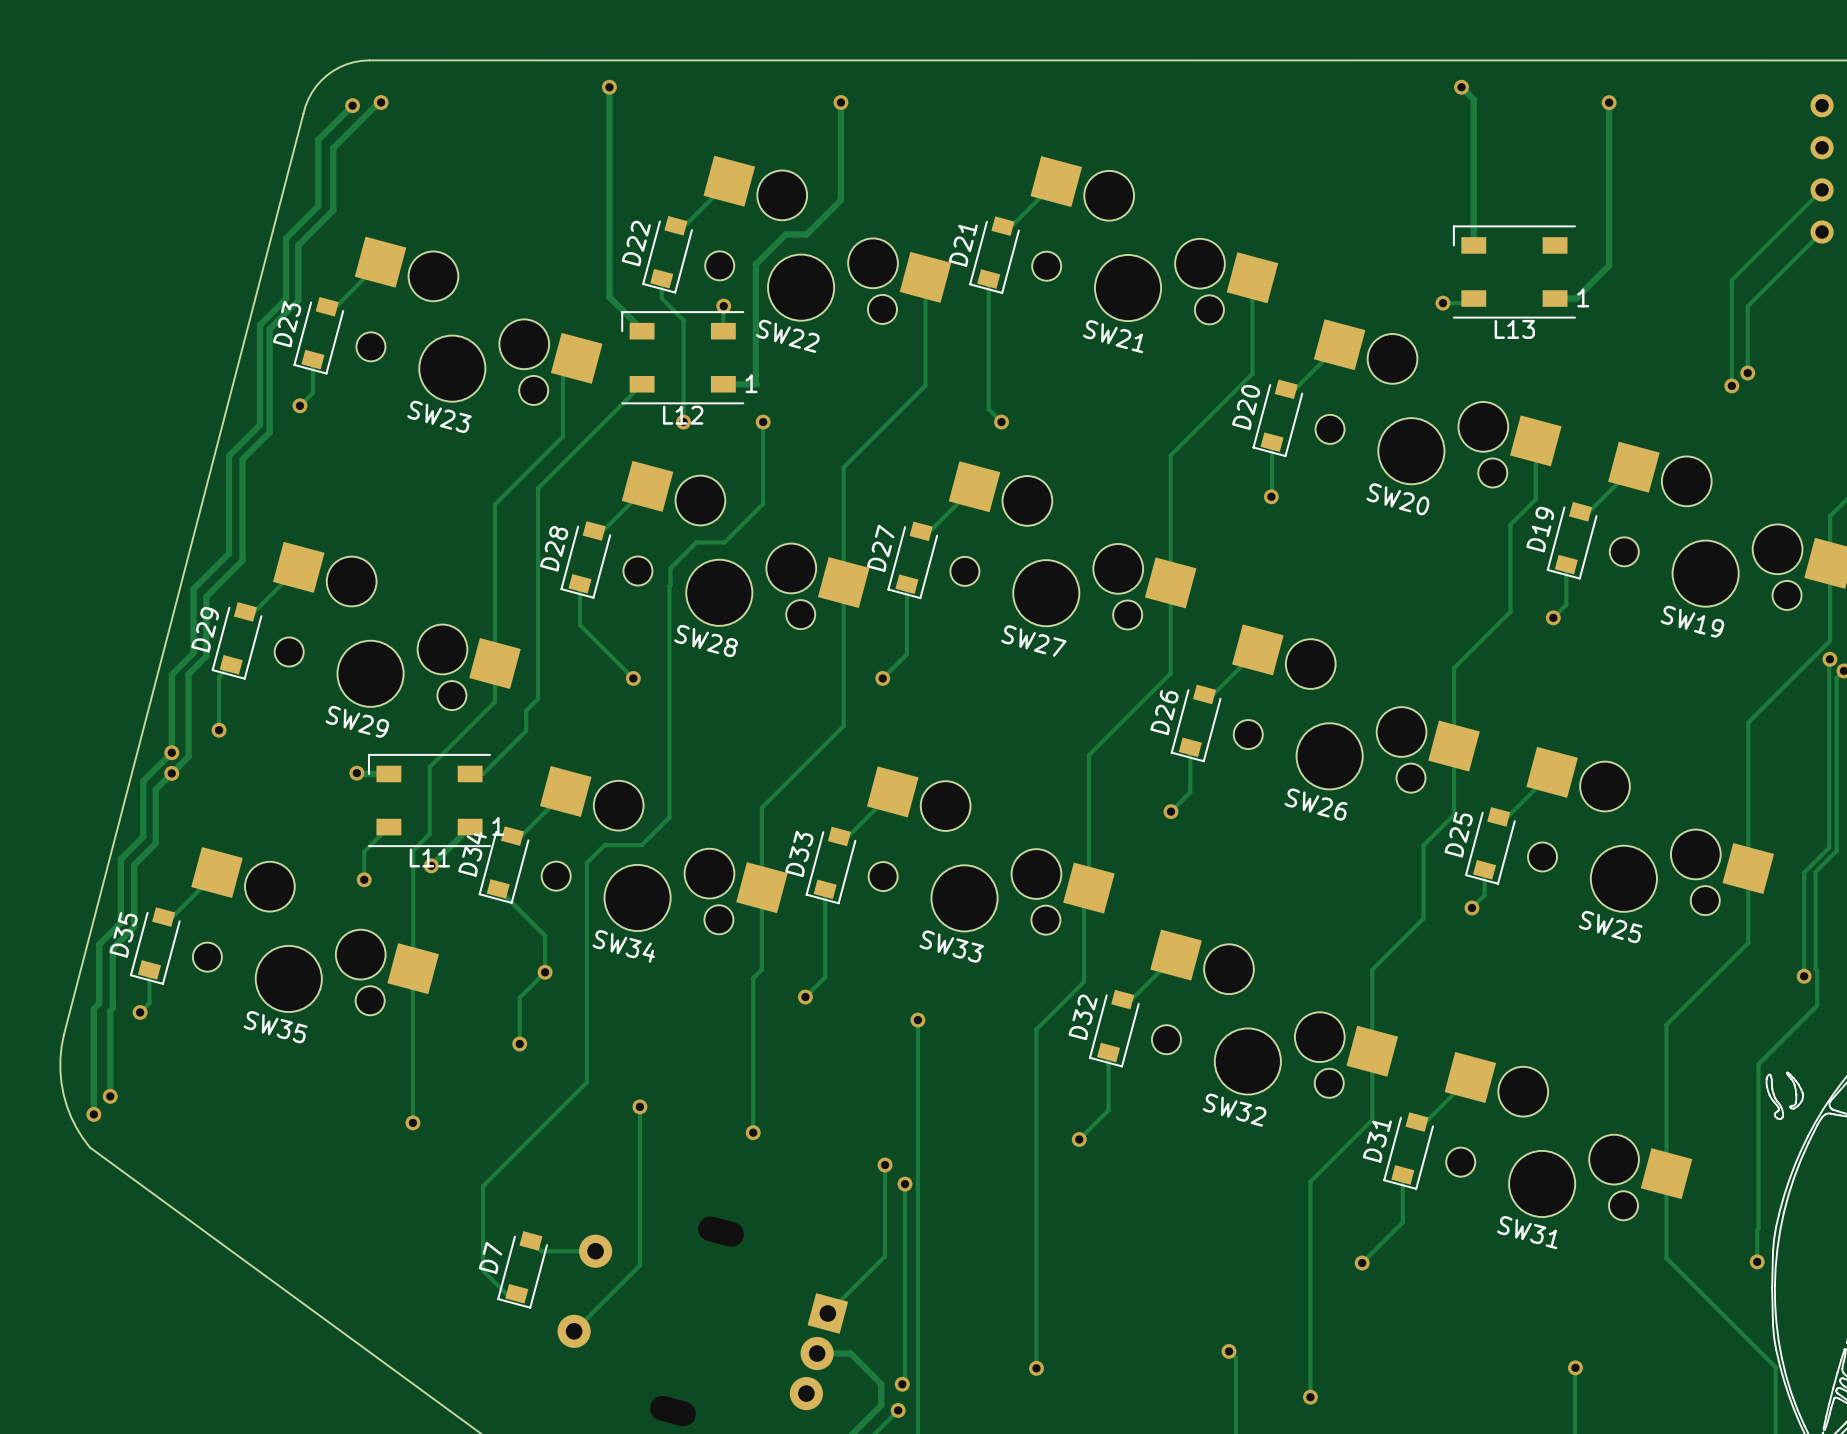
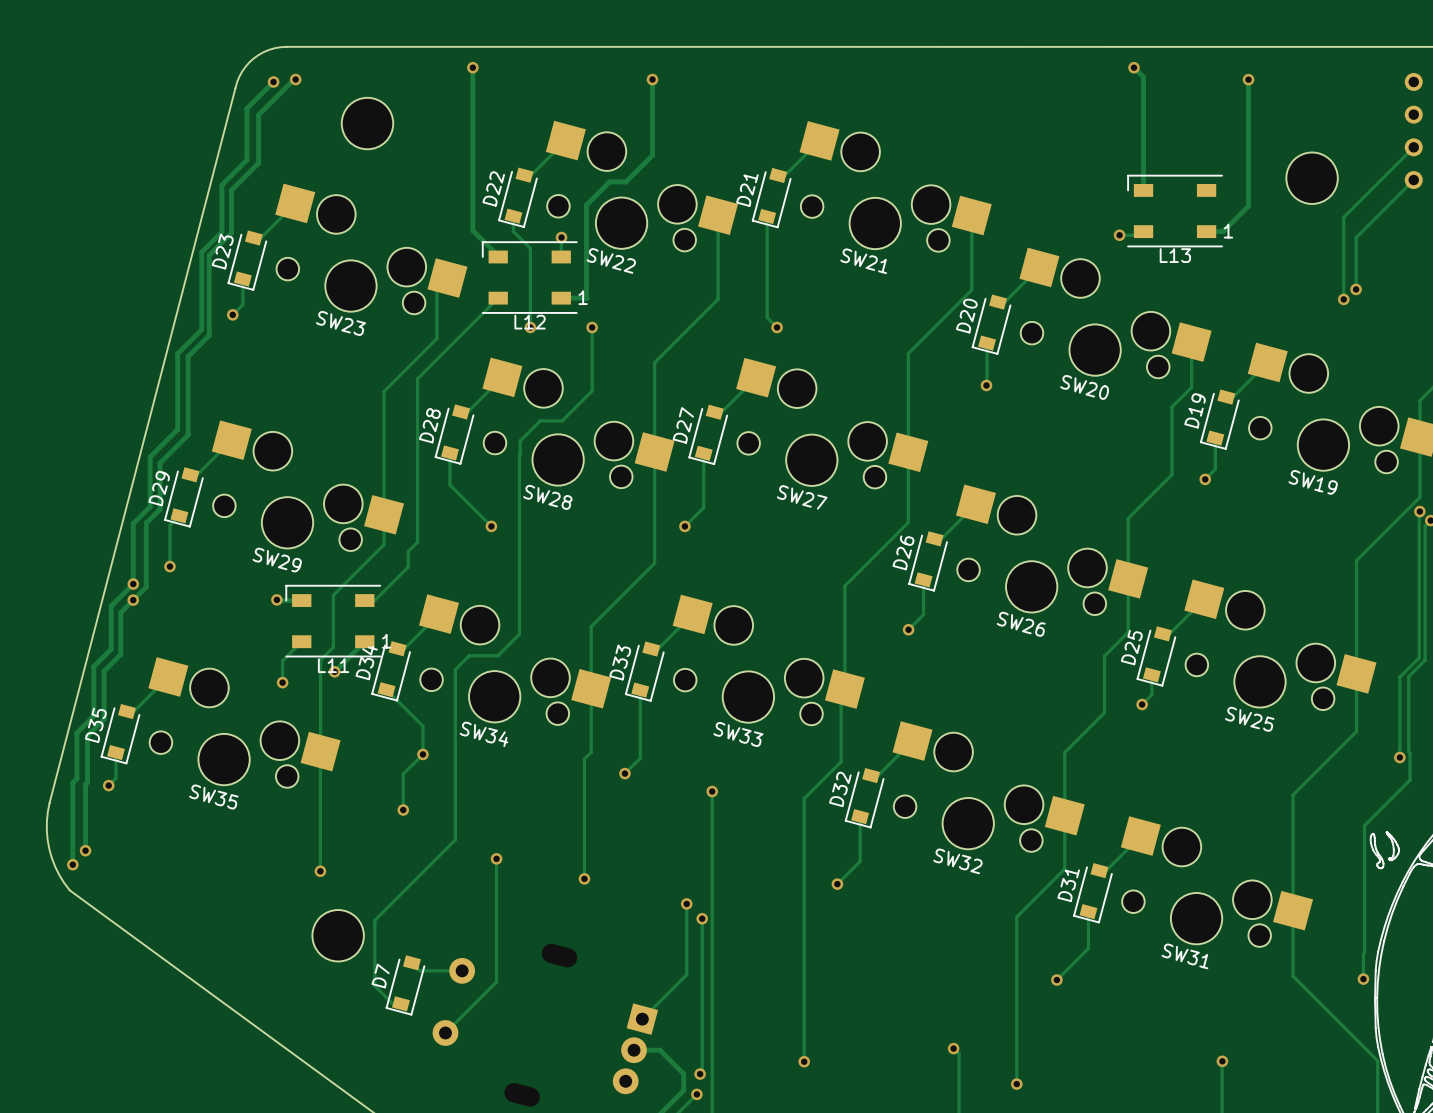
part: none -> (367, 123)
part: none -> (1312, 178)
part: none -> (338, 935)

